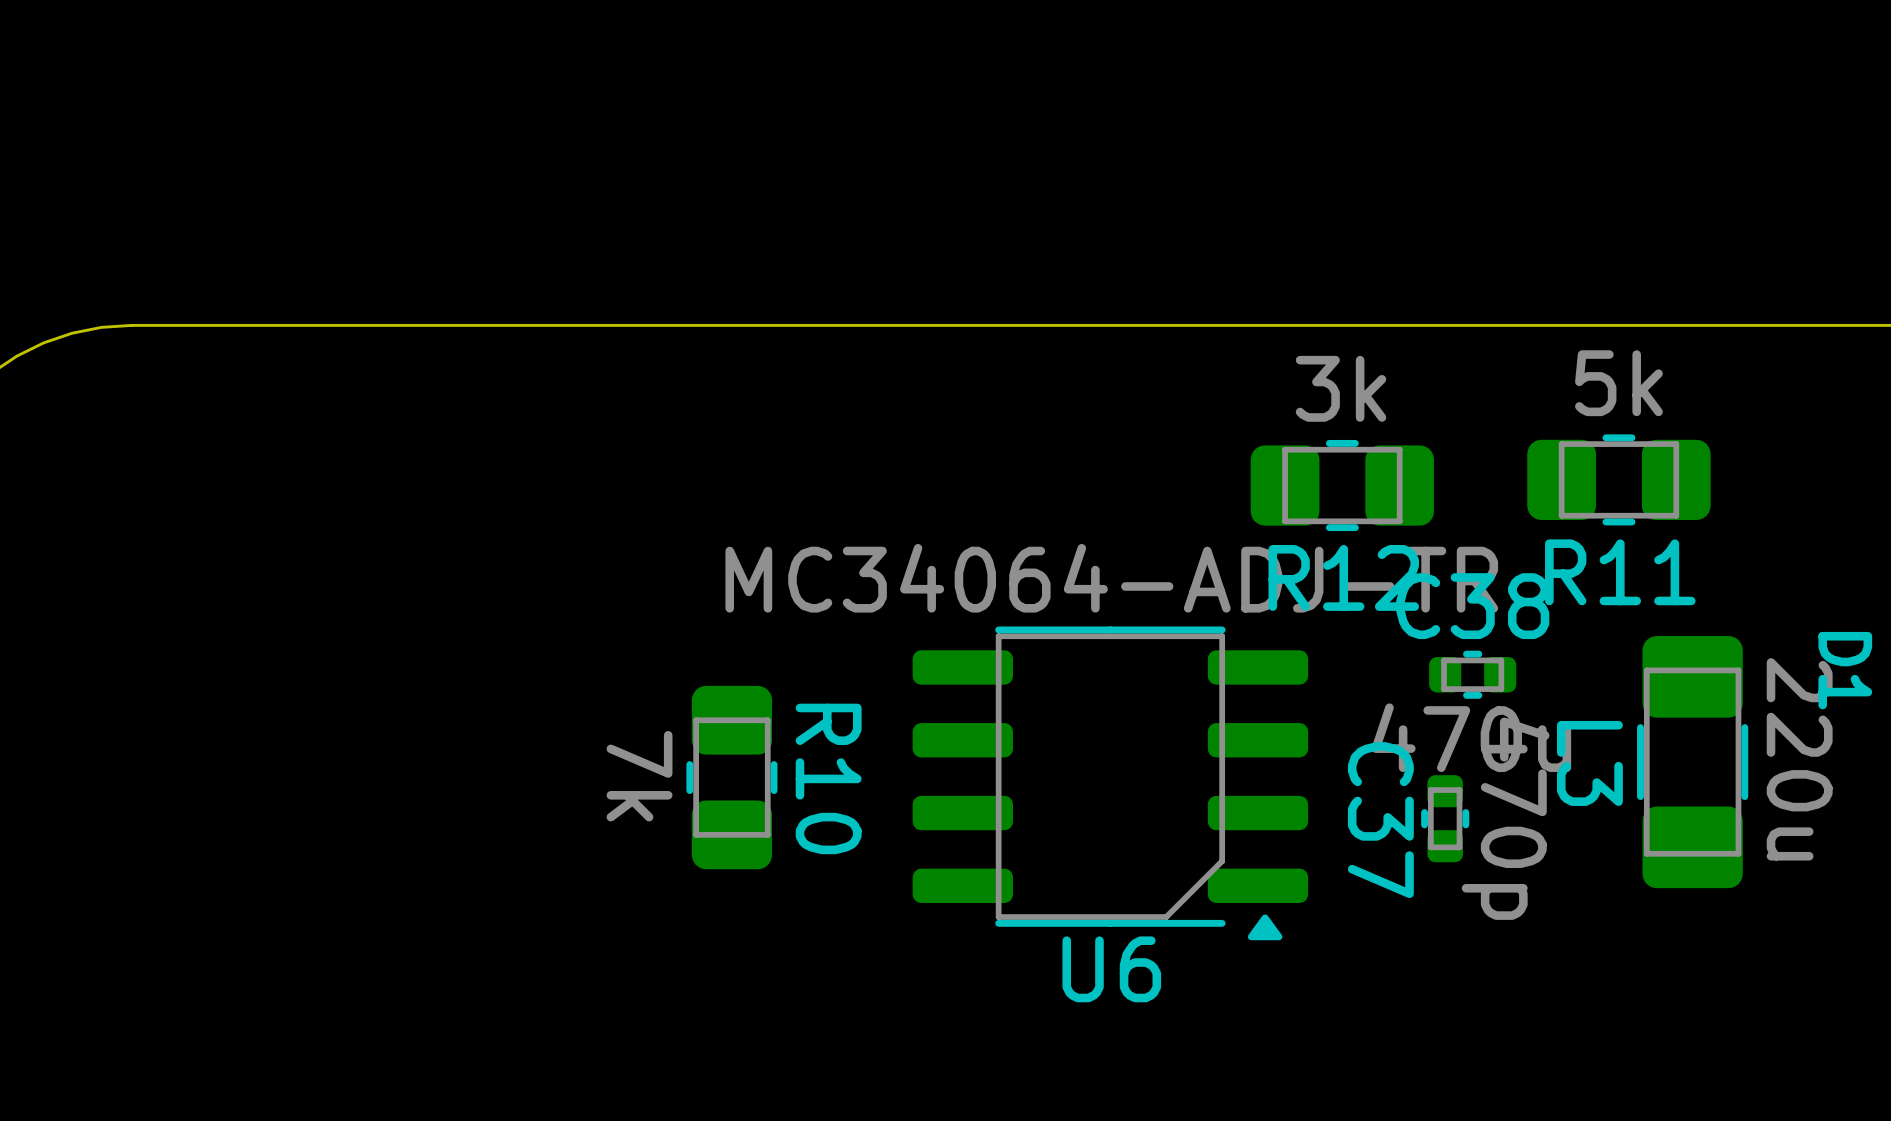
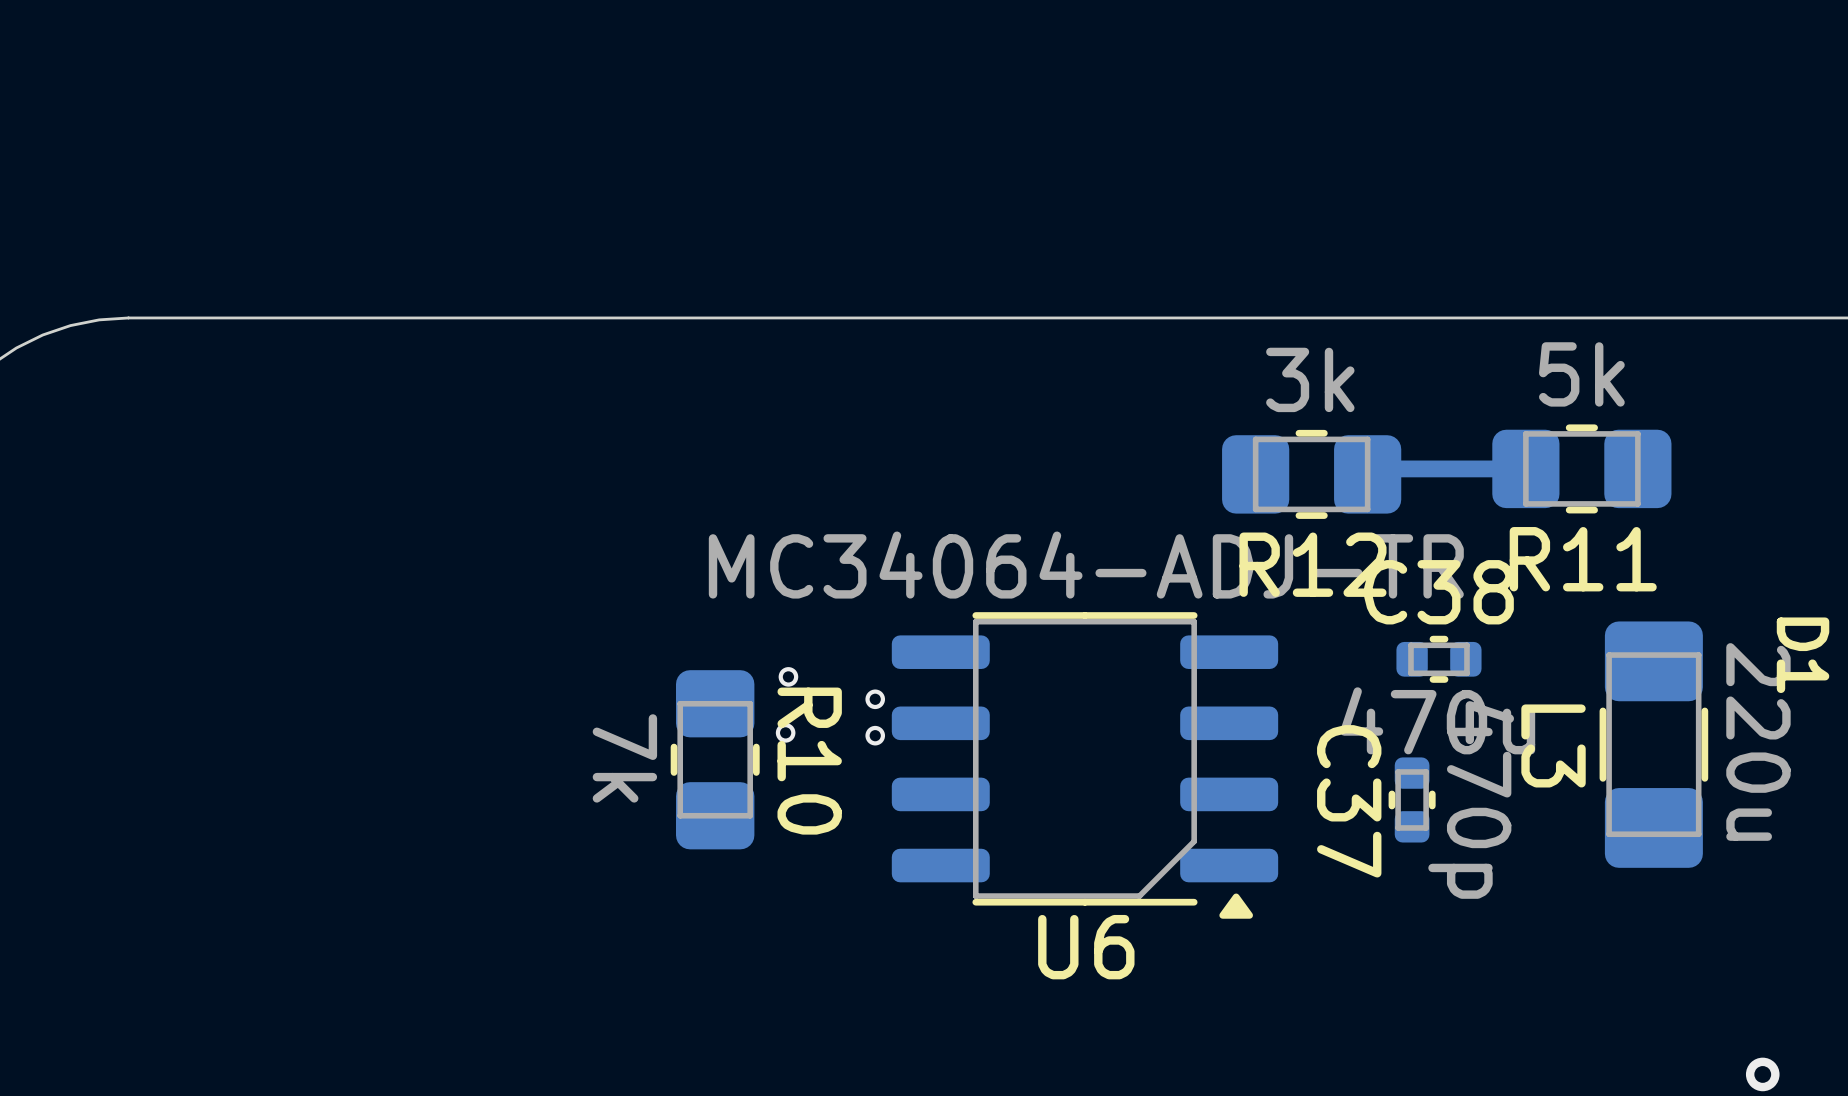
track: none -> (1525, 468) (1373, 468) (1367, 474)
via: none -> (788, 676)
via: none -> (875, 699)
via: none -> (785, 732)
via: none -> (875, 735)
via: none -> (1762, 1074)

